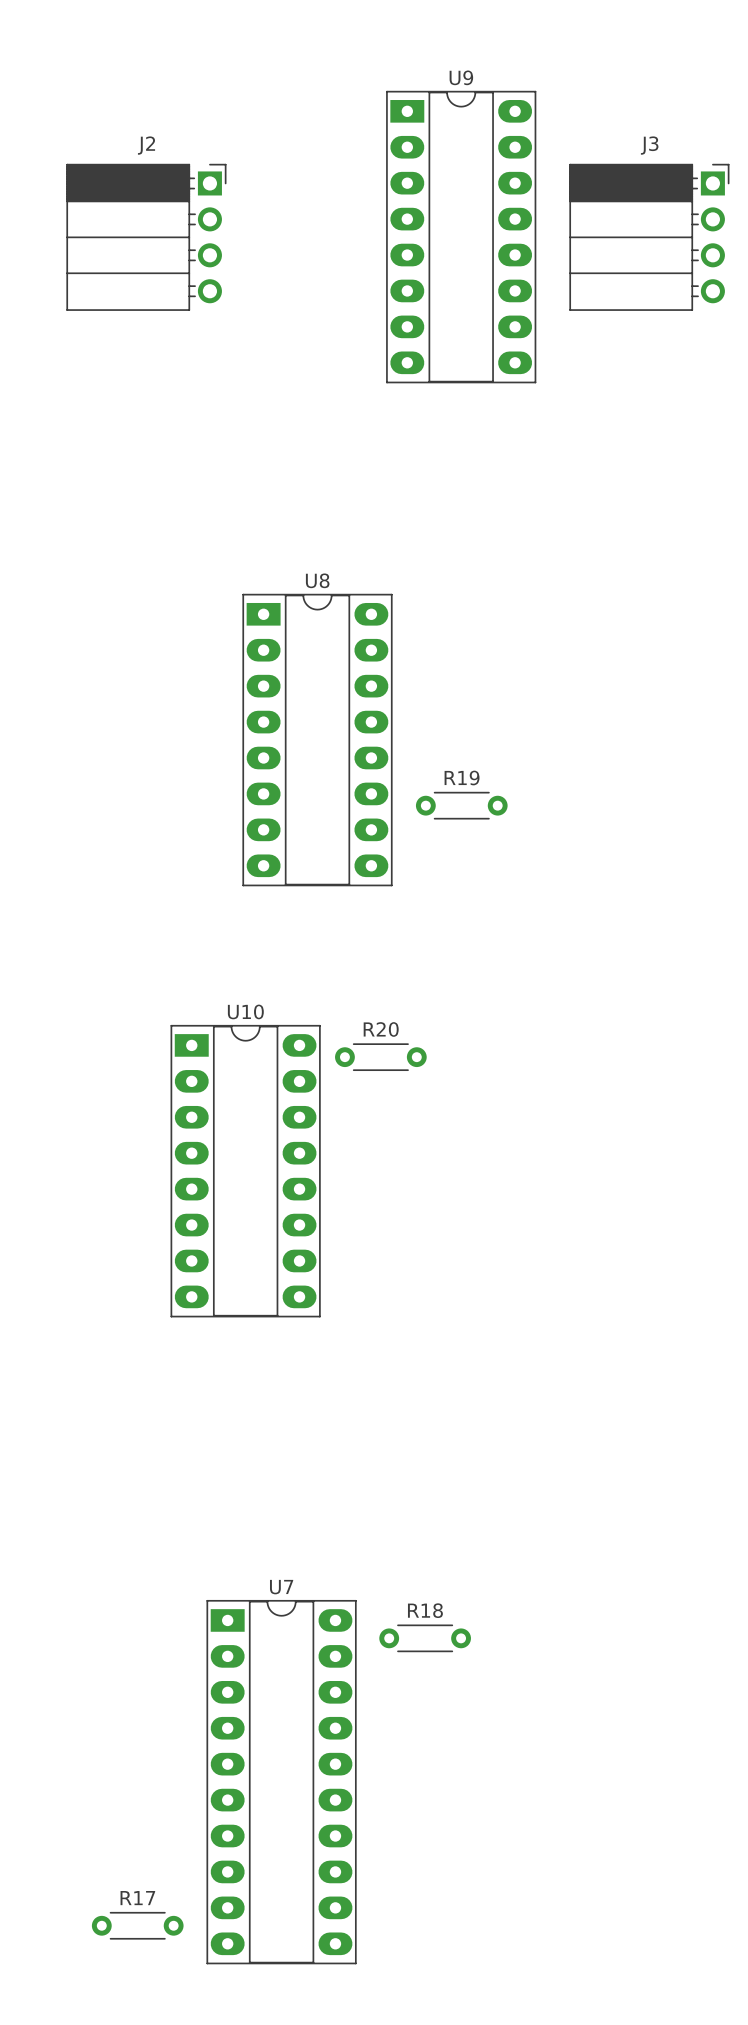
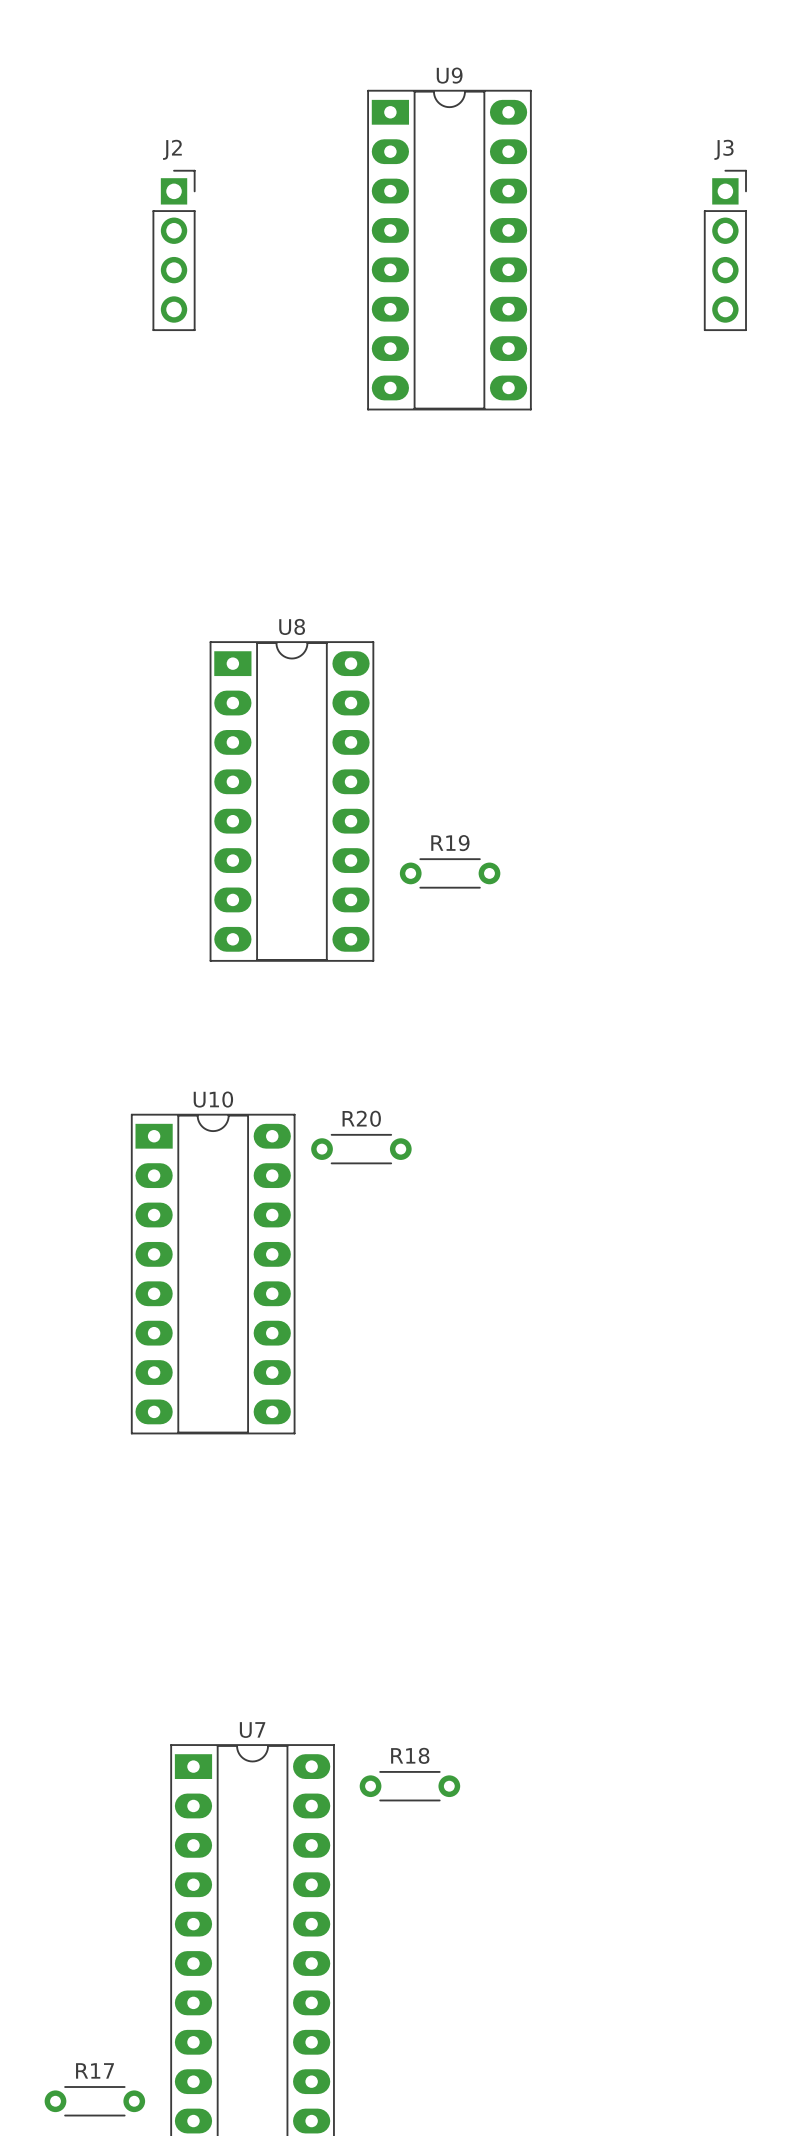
J2 footprint: [66, 163, 227, 311] -> [152, 169, 196, 332]
J3 footprint: [569, 163, 730, 311] -> [703, 169, 747, 332]

